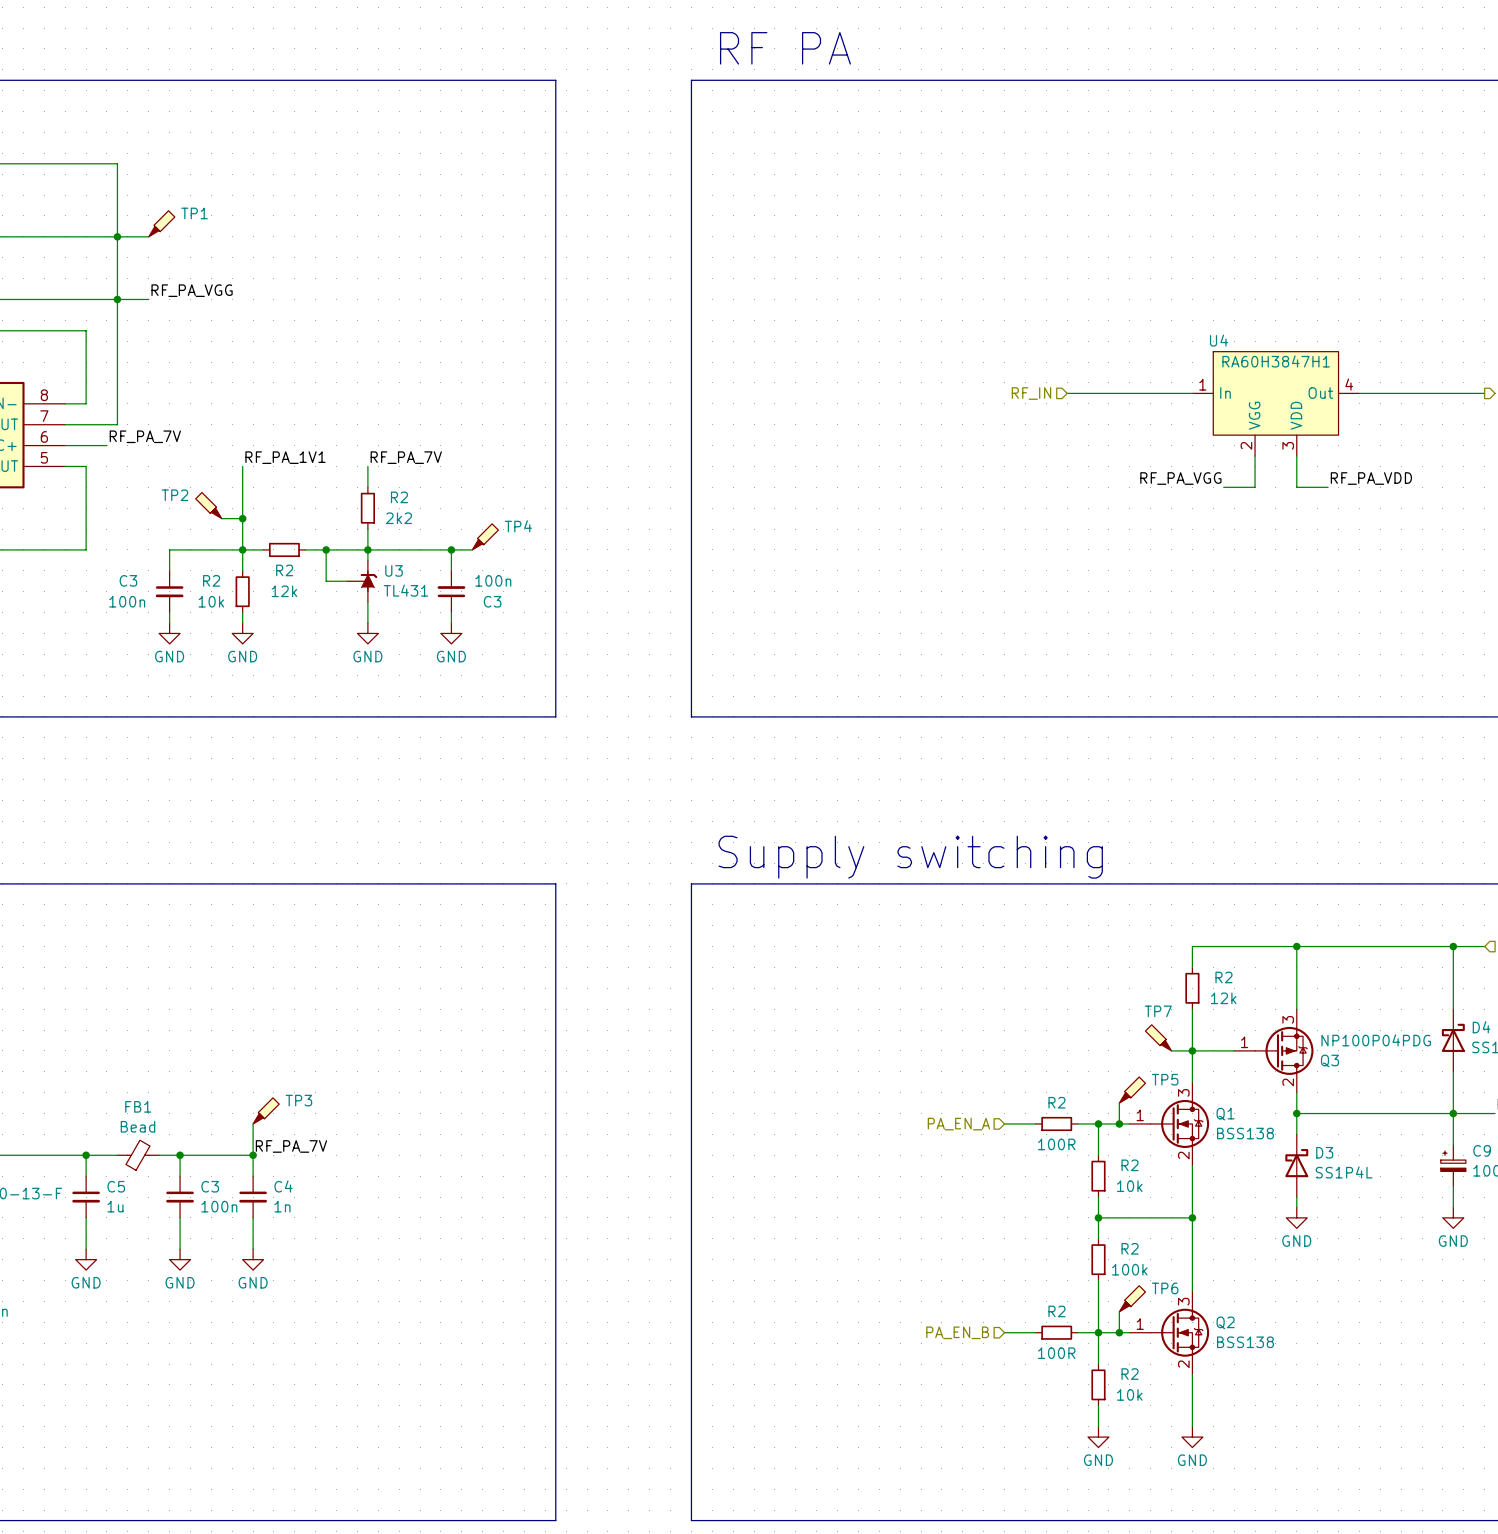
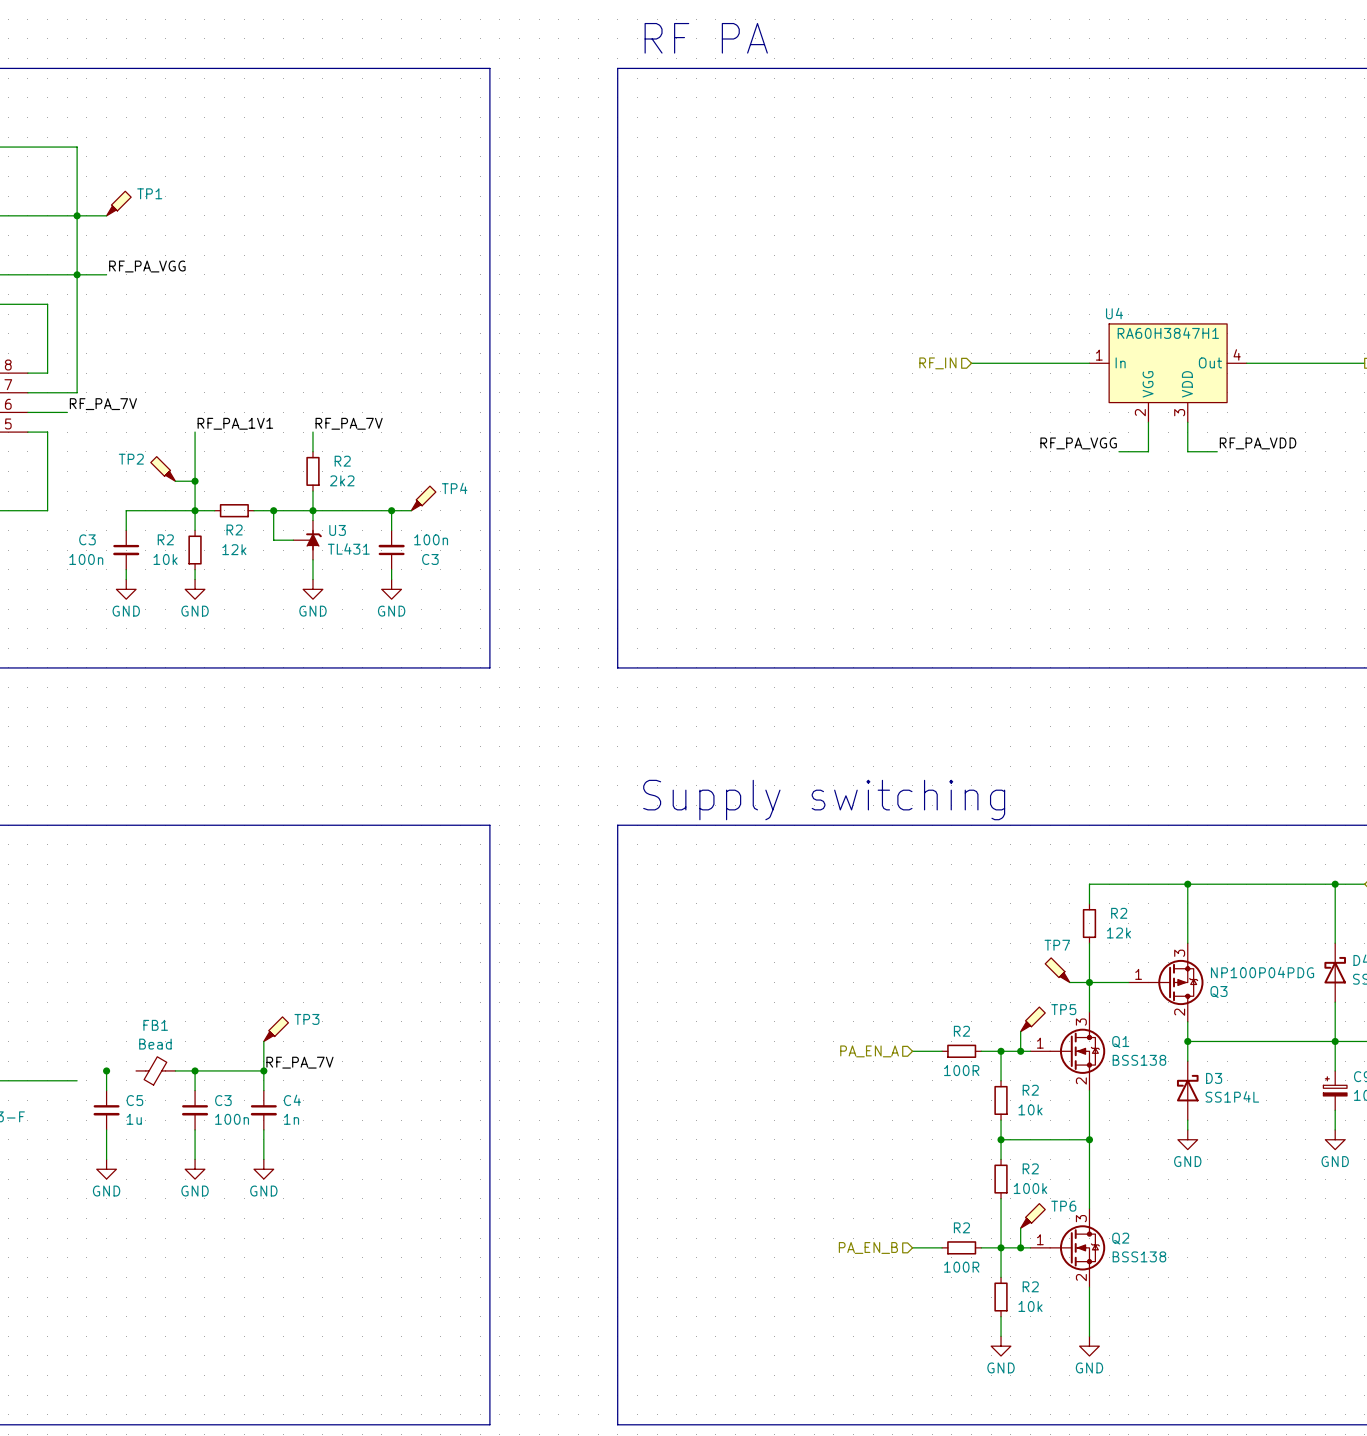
TP3 position: (266, 1110) -> (276, 1029)
wire: (253, 1123) (253, 1176) -> (263, 1041) (263, 1090)
junction: none -> (106, 1070)
junction: none -> (263, 1070)
label position: RF_PA_7V (291, 1146) -> RF_PA_7V (299, 1062)
wire: (86, 1155) (86, 1176) -> (106, 1070) (106, 1090)
junction: (86, 1155) -> none
FB1 position: (138, 1155) -> (155, 1070)
wire: (159, 1155) (253, 1155) -> (175, 1070) (263, 1070)
wire: (180, 1155) (180, 1176) -> (195, 1070) (195, 1090)
junction: (180, 1155) -> none
junction position: (253, 1155) -> (195, 1070)
C5 position: (86, 1197) -> (106, 1110)
C3 position: (180, 1197) -> (195, 1110)
C4 position: (253, 1197) -> (263, 1110)
wire: (86, 1217) (86, 1249) -> (106, 1129) (106, 1159)
wire: (180, 1217) (180, 1249) -> (195, 1129) (195, 1159)
wire: (253, 1217) (253, 1249) -> (263, 1129) (263, 1159)
power symbol: none -> GND (106, 1169)
power symbol: none -> GND (263, 1169)
power symbol: GND (86, 1259) -> none
power symbol: GND (180, 1259) -> none
power symbol position: GND (253, 1259) -> GND (195, 1169)

